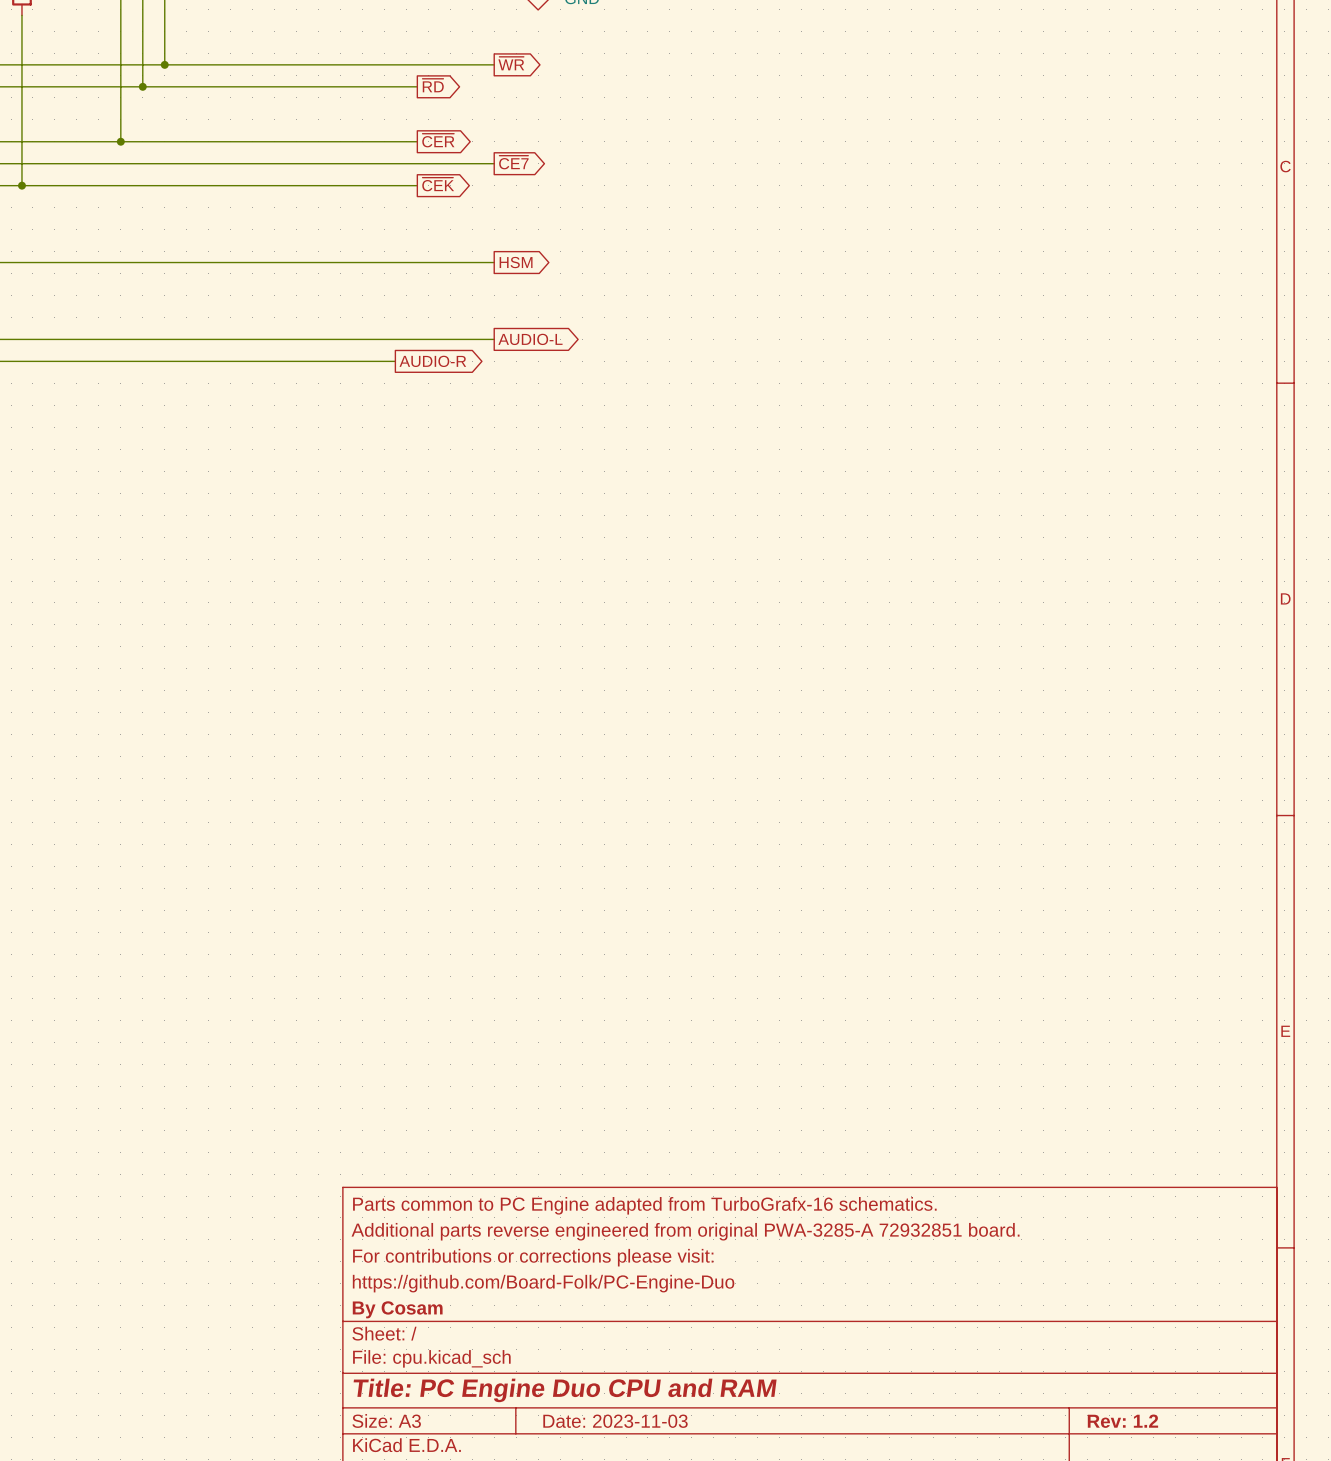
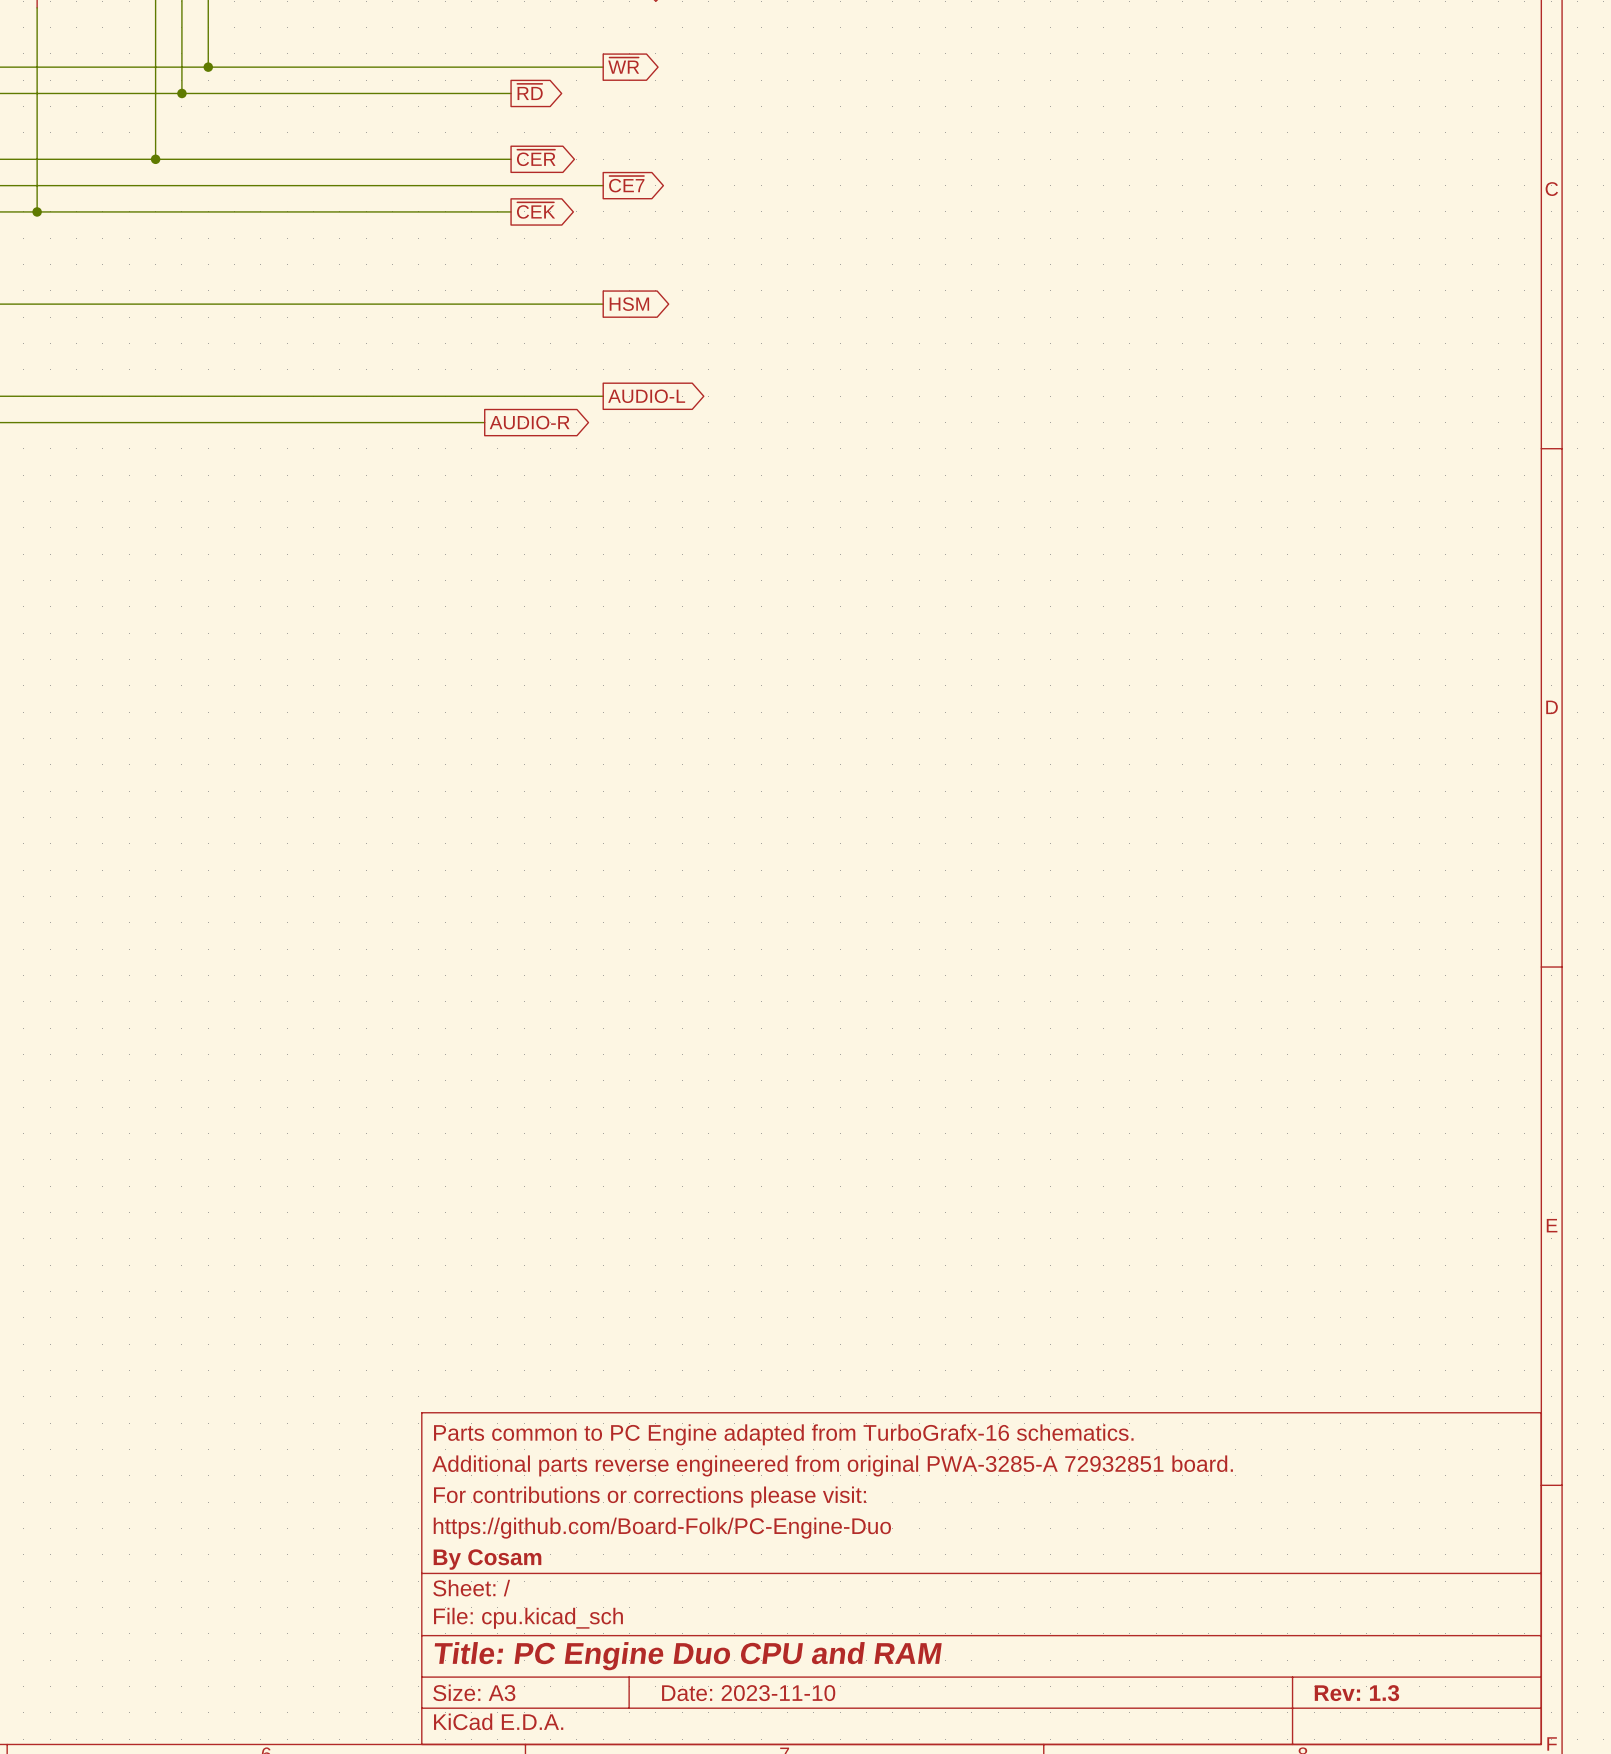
title block: Date: 2023-11-03 (615, 1421) -> Date: 2023-11-10 (748, 1693)
title block: Rev: 1.2 (1122, 1421) -> Rev: 1.3 (1356, 1693)

